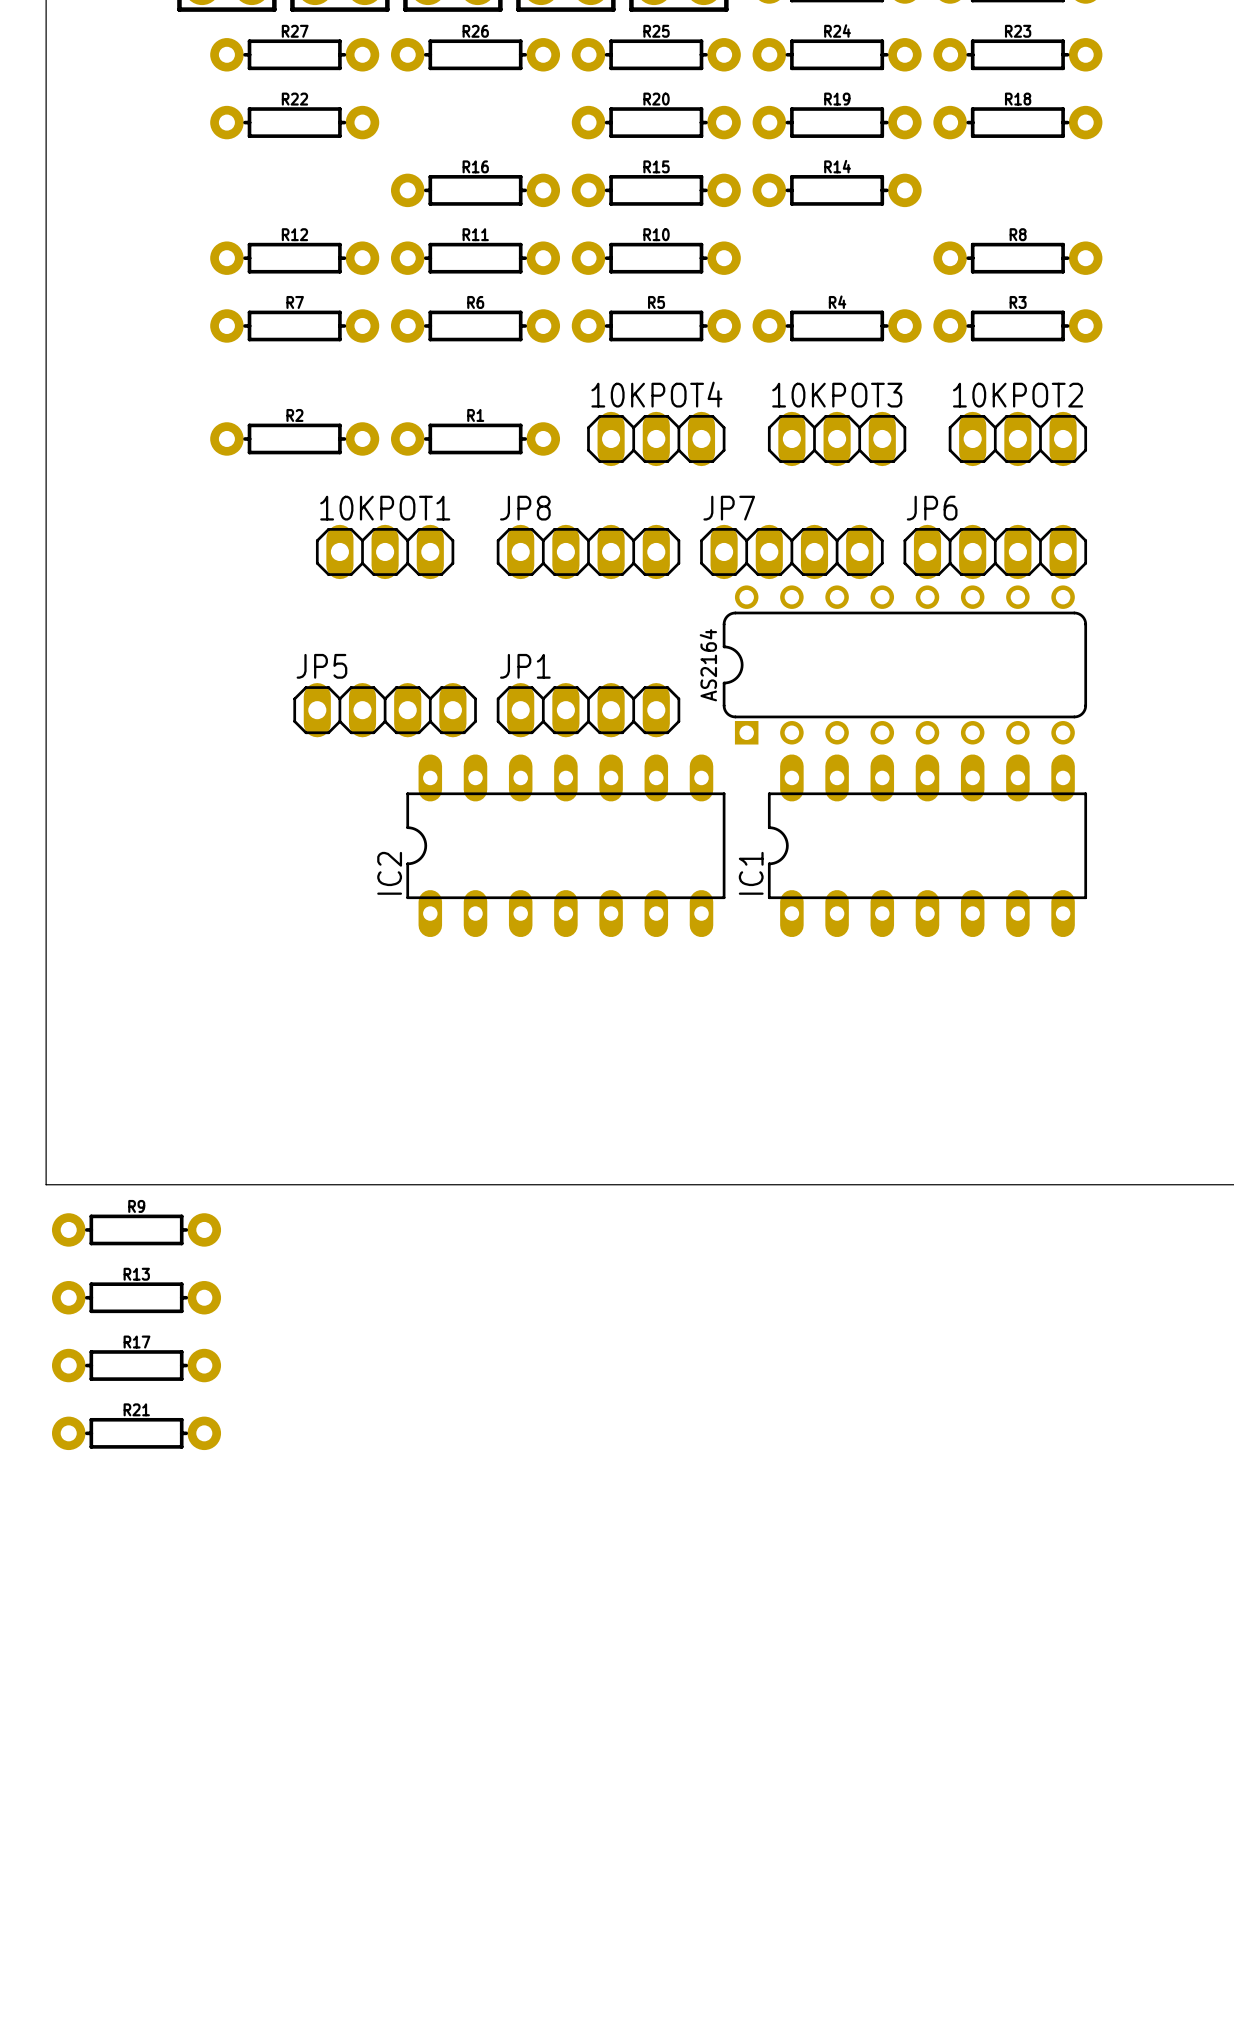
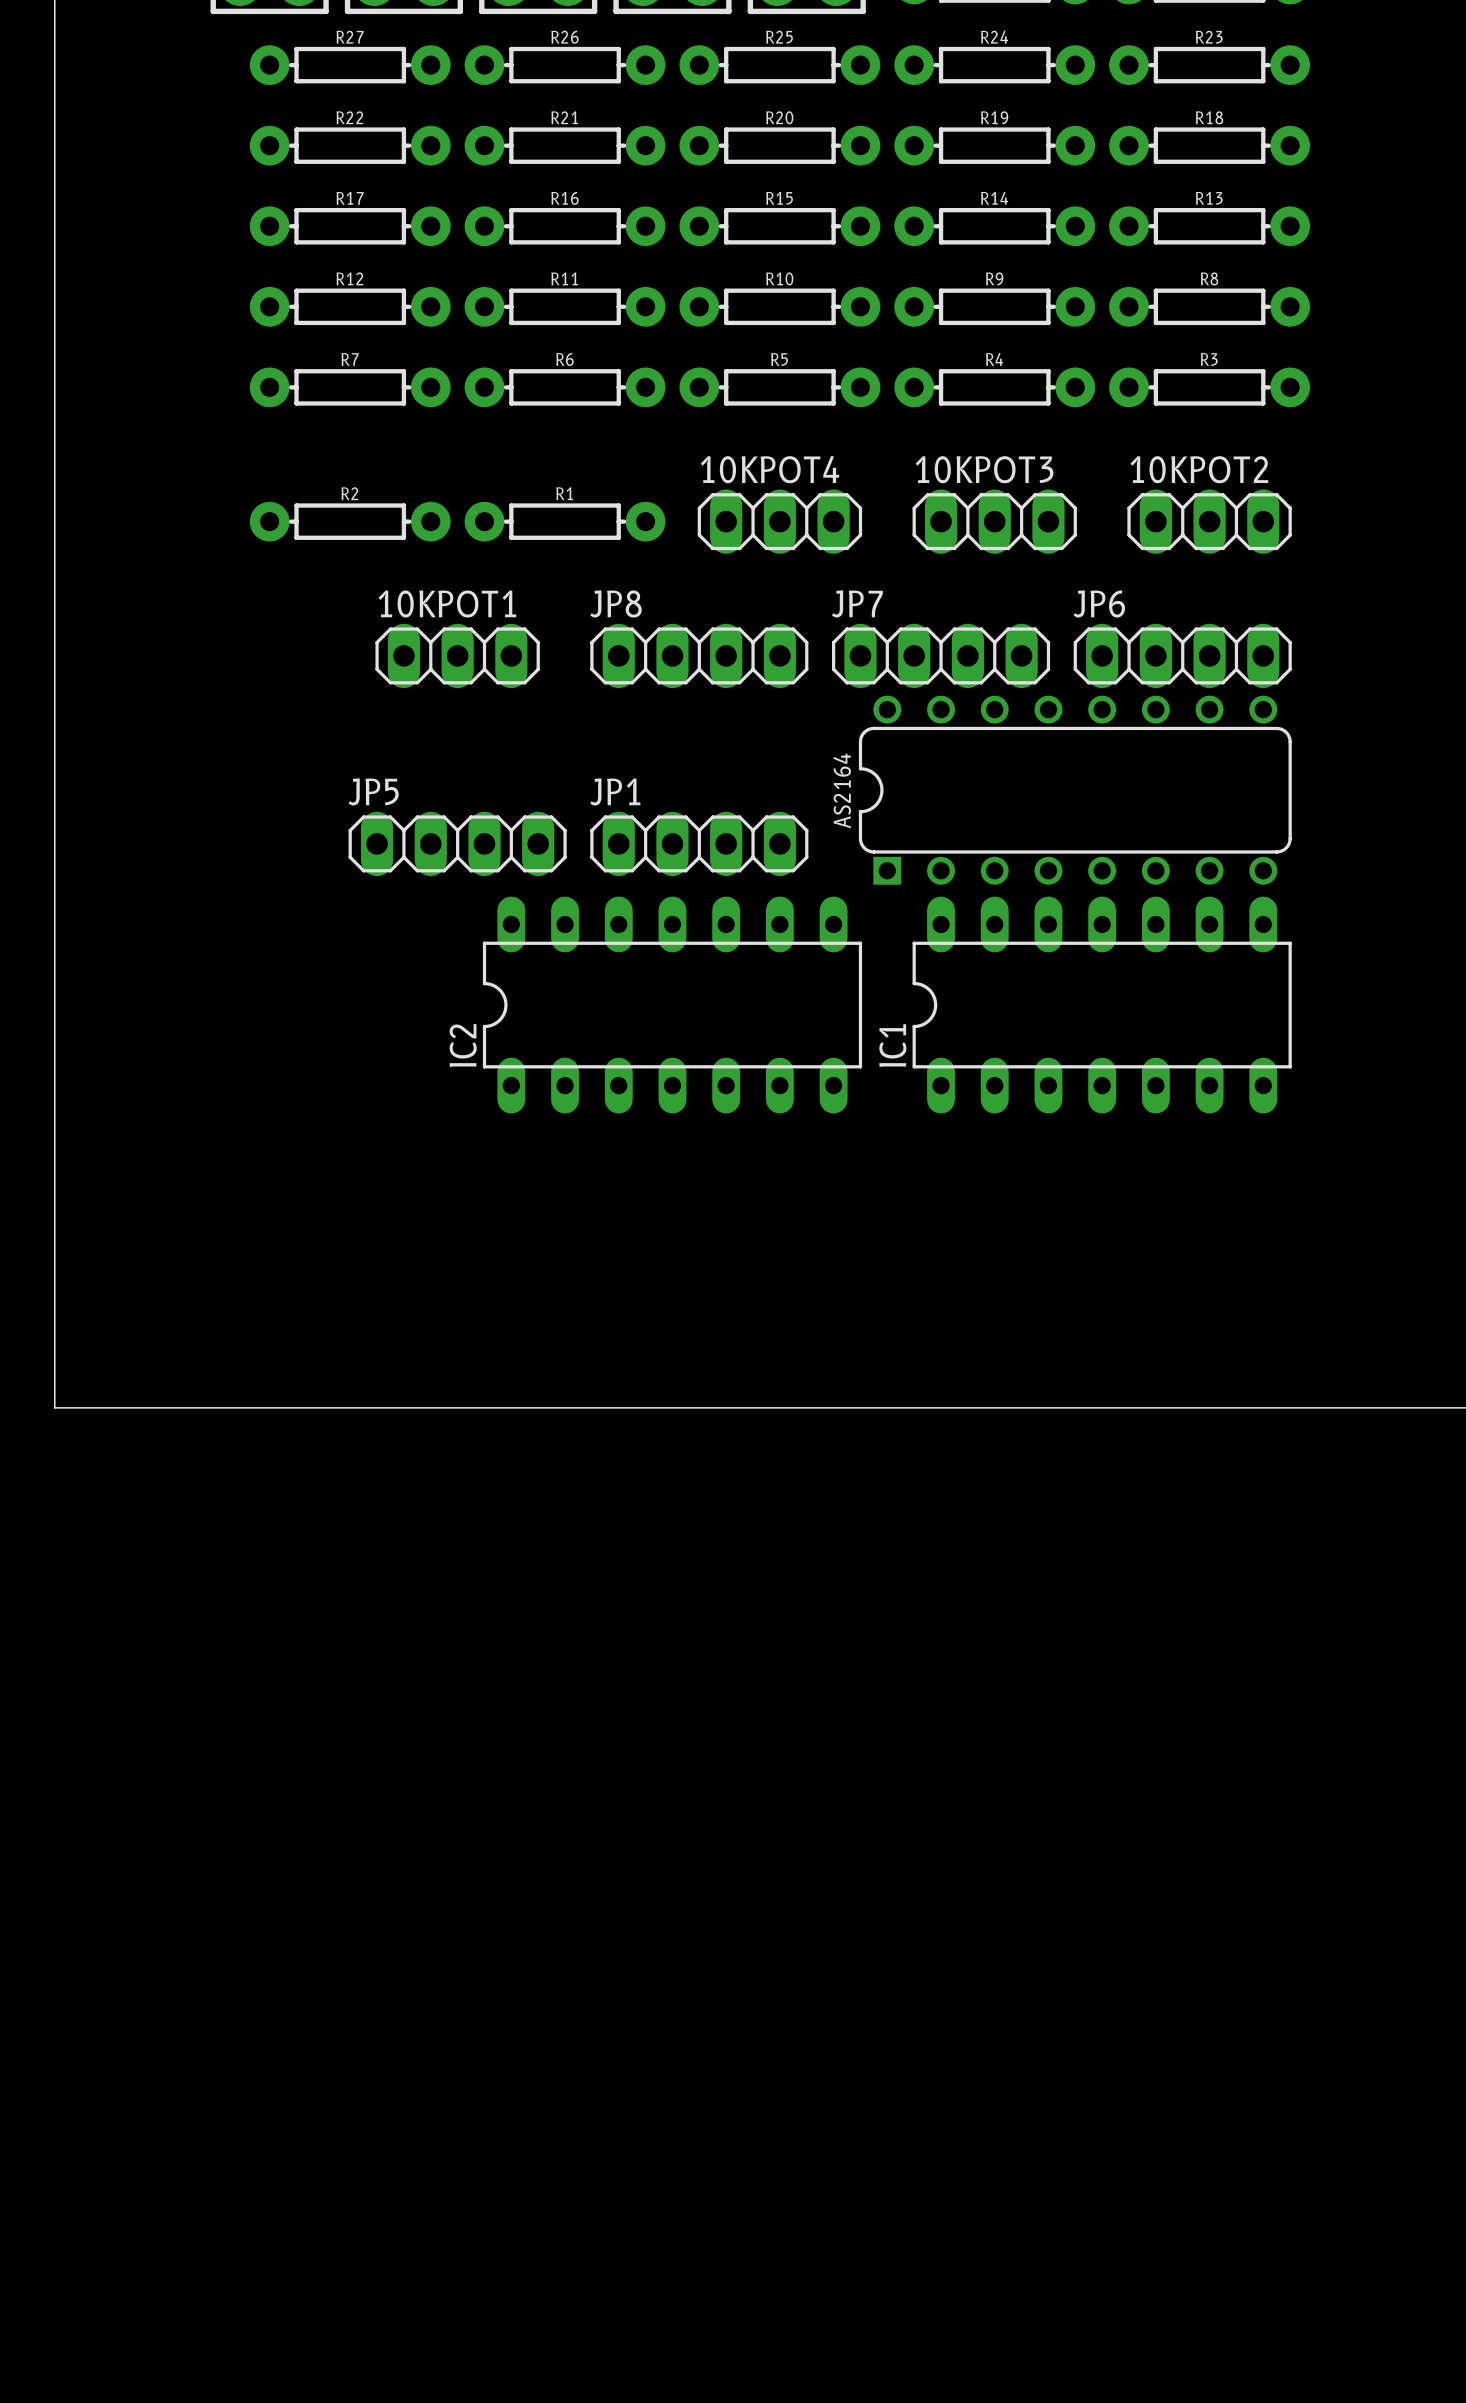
R9 position: (136, 1229) -> (994, 306)
R13 position: (136, 1297) -> (1209, 226)
R17 position: (136, 1365) -> (350, 226)
R21 position: (136, 1433) -> (565, 145)

